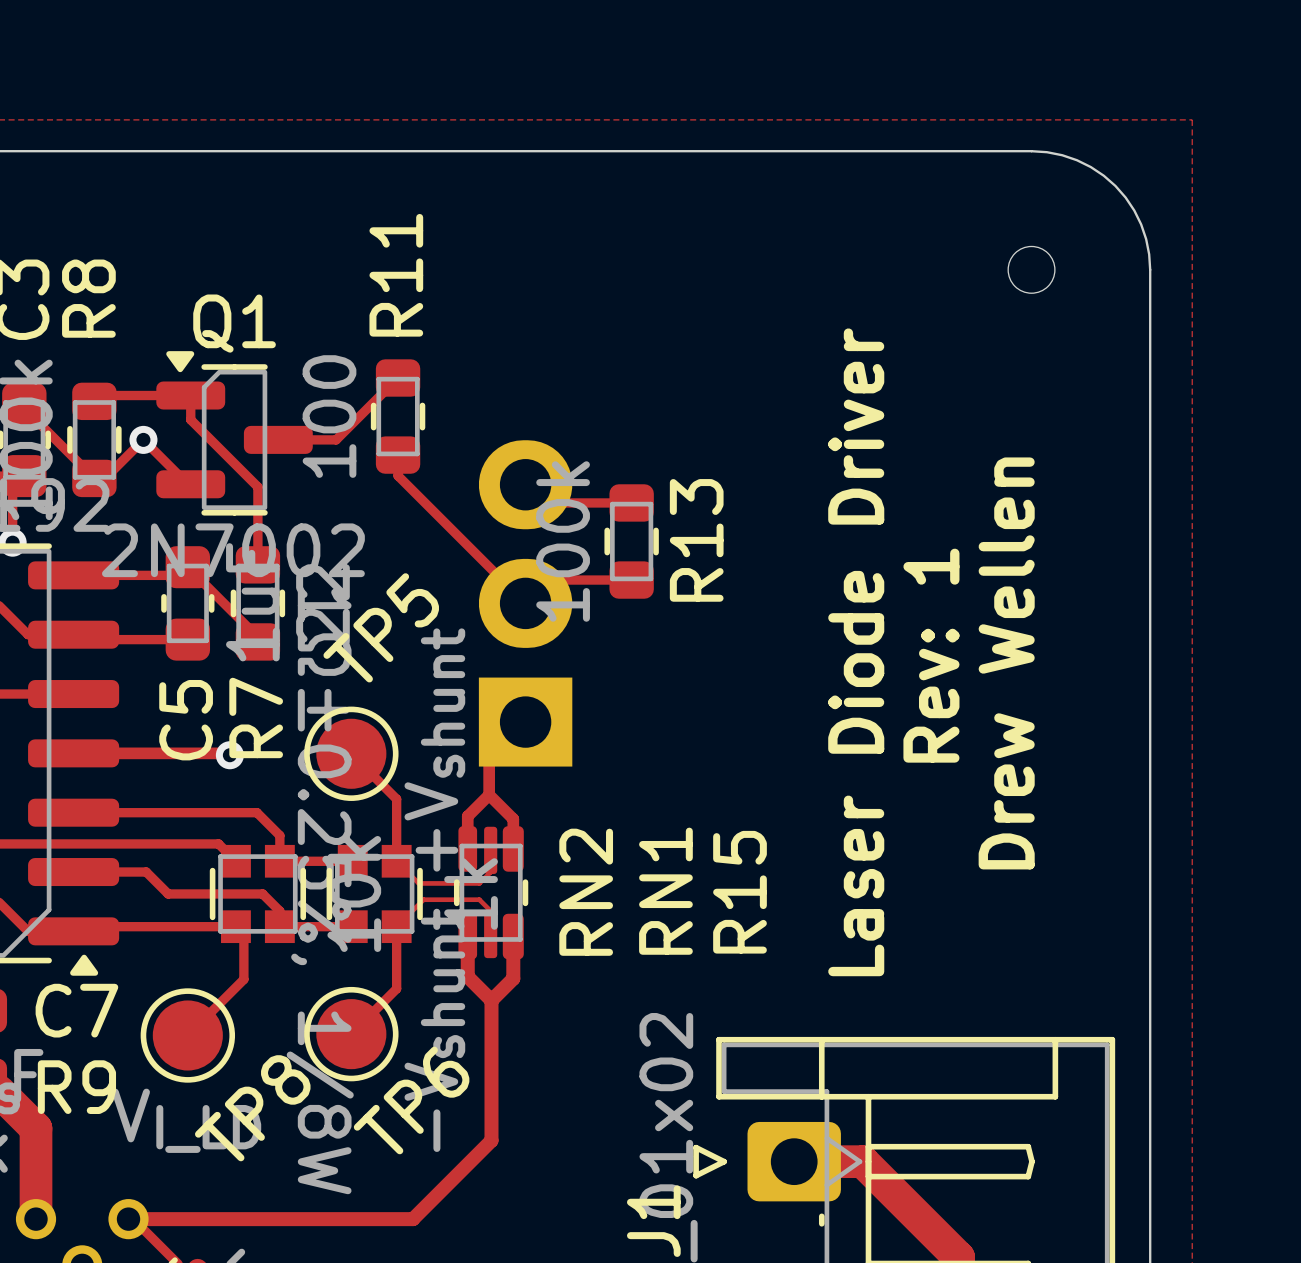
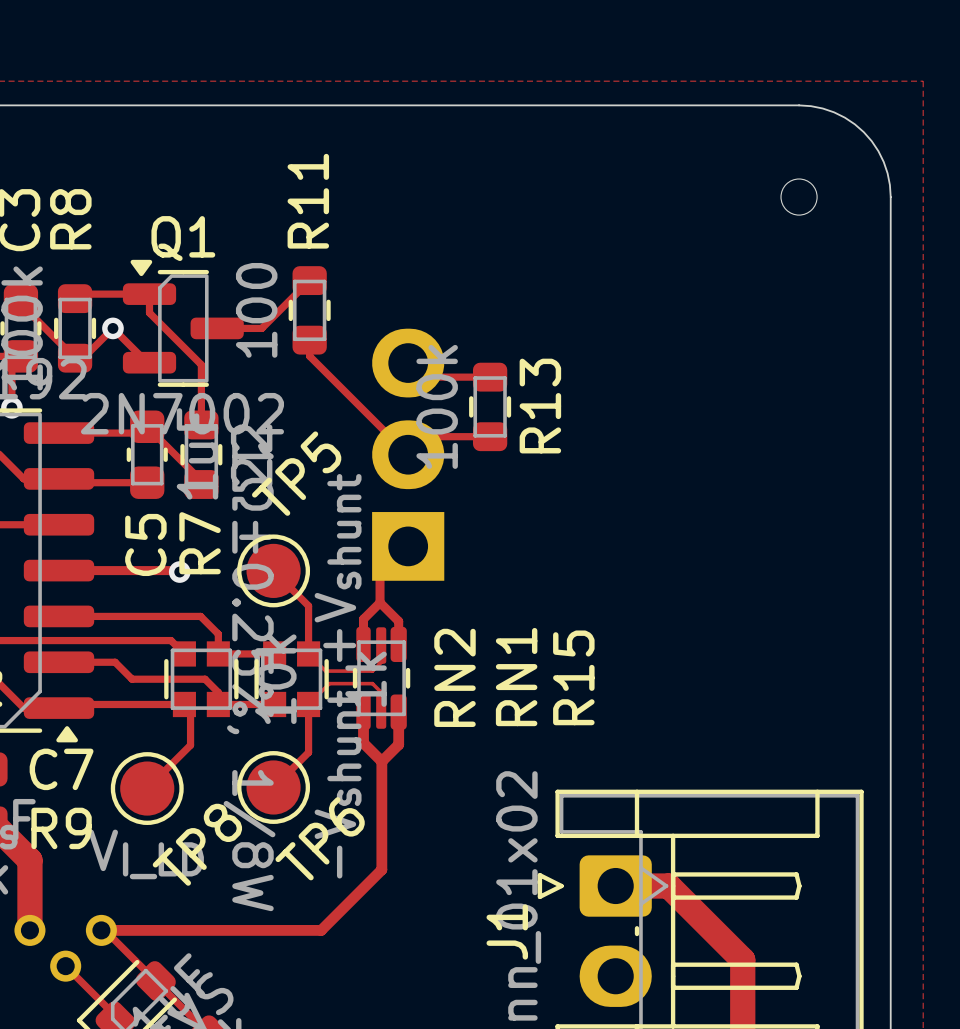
text: Laser Diode Driver (856, 652) -> none
text: Rev: 1 (931, 655) -> none
text: Drew Wellen (1006, 663) -> none

